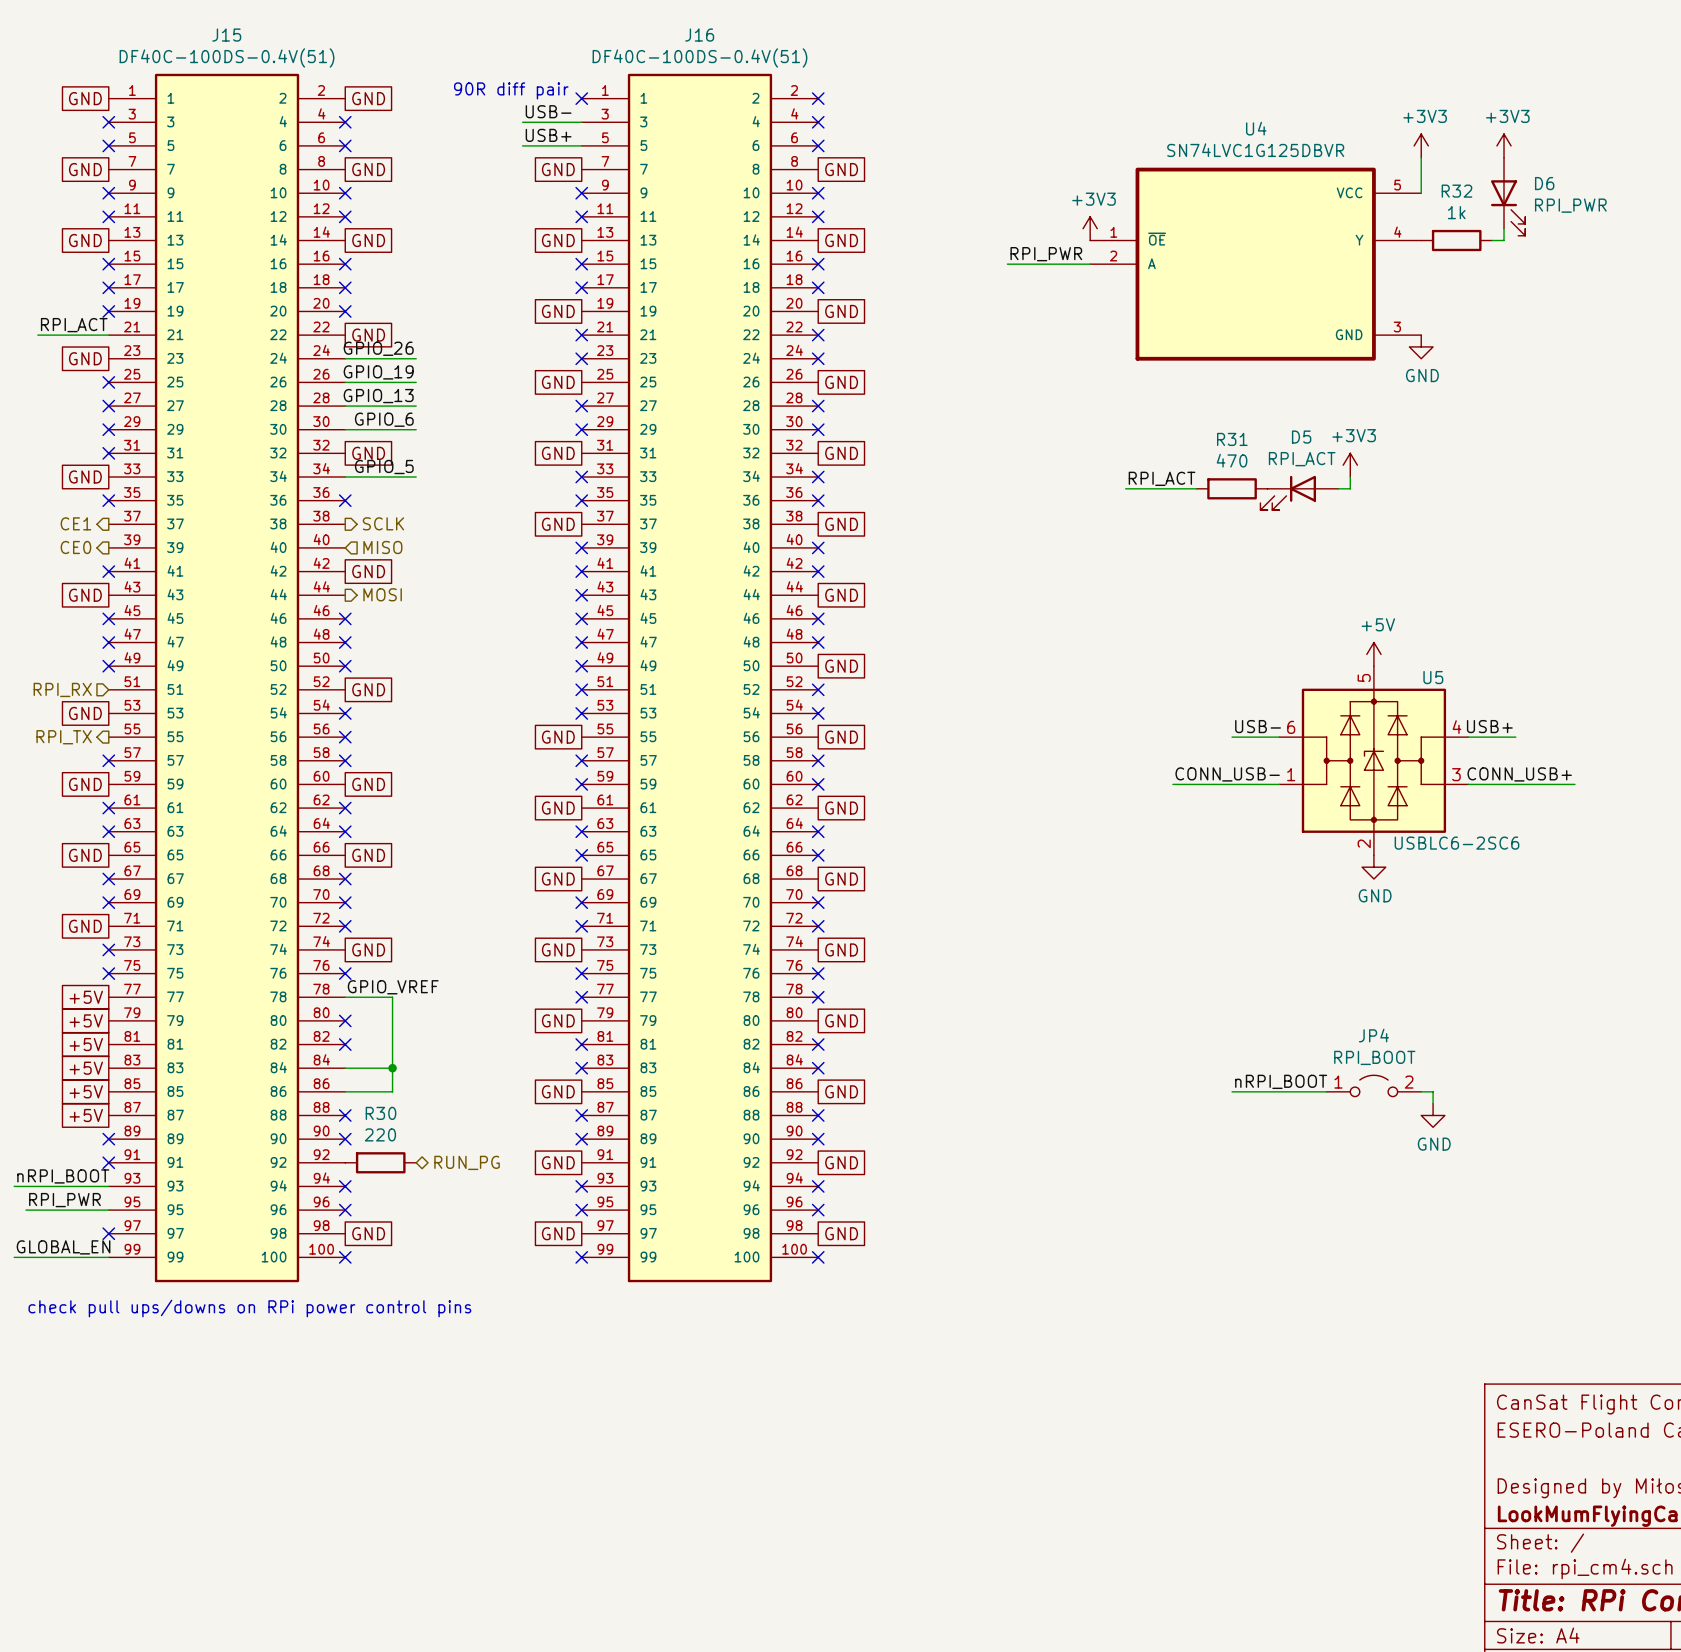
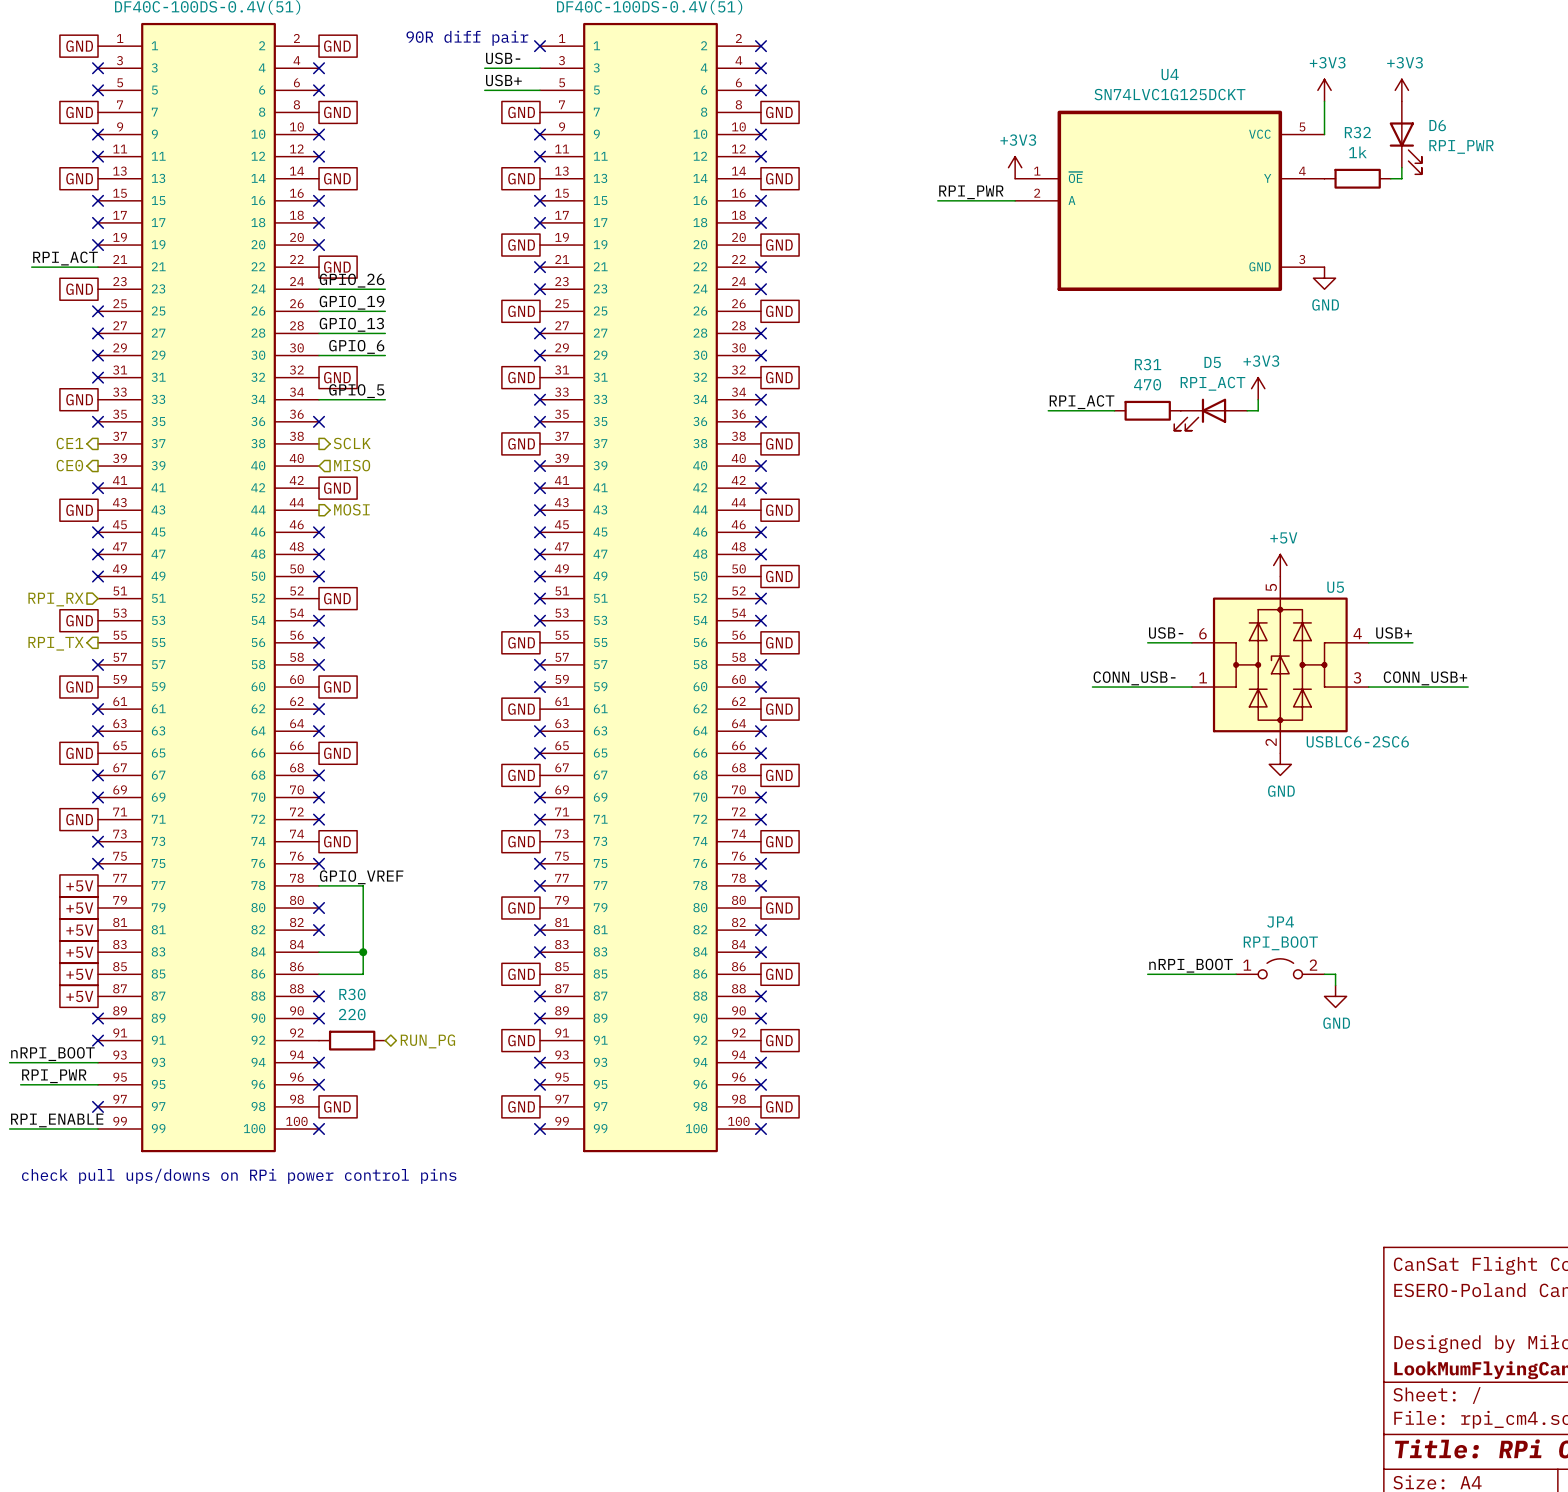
U4 value: SN74LVC1G125DBVR (1255, 150) -> SN74LVC1G125DCKT (1169, 94)
label: GLOBAL_EN (63, 1247) -> RPI_ENABLE (57, 1120)

